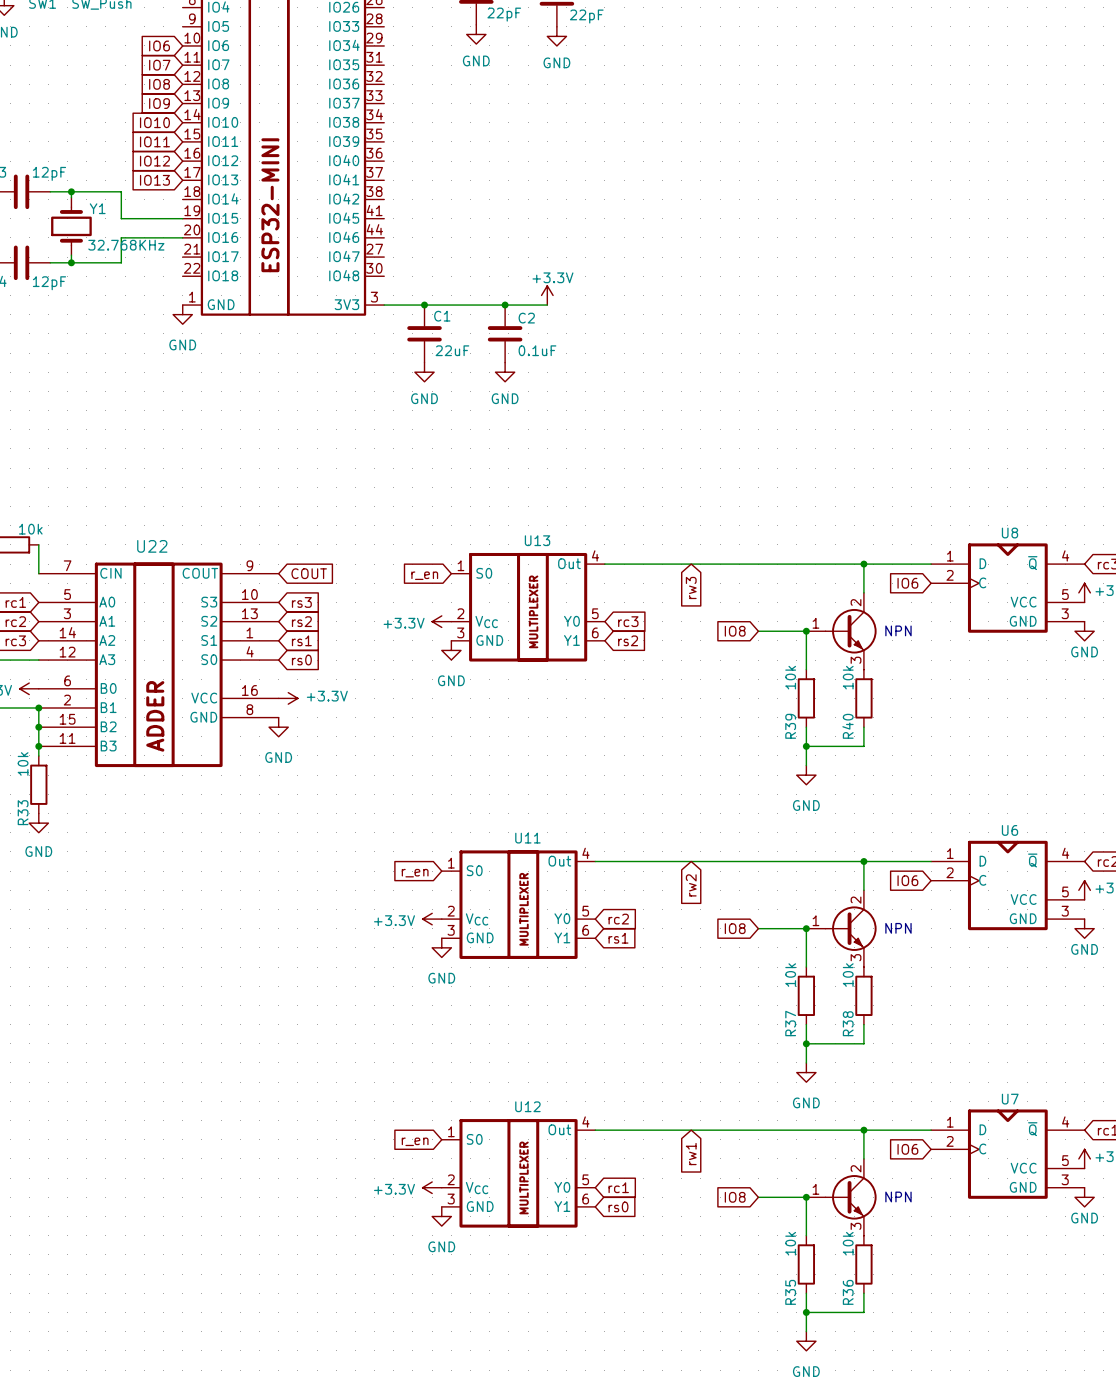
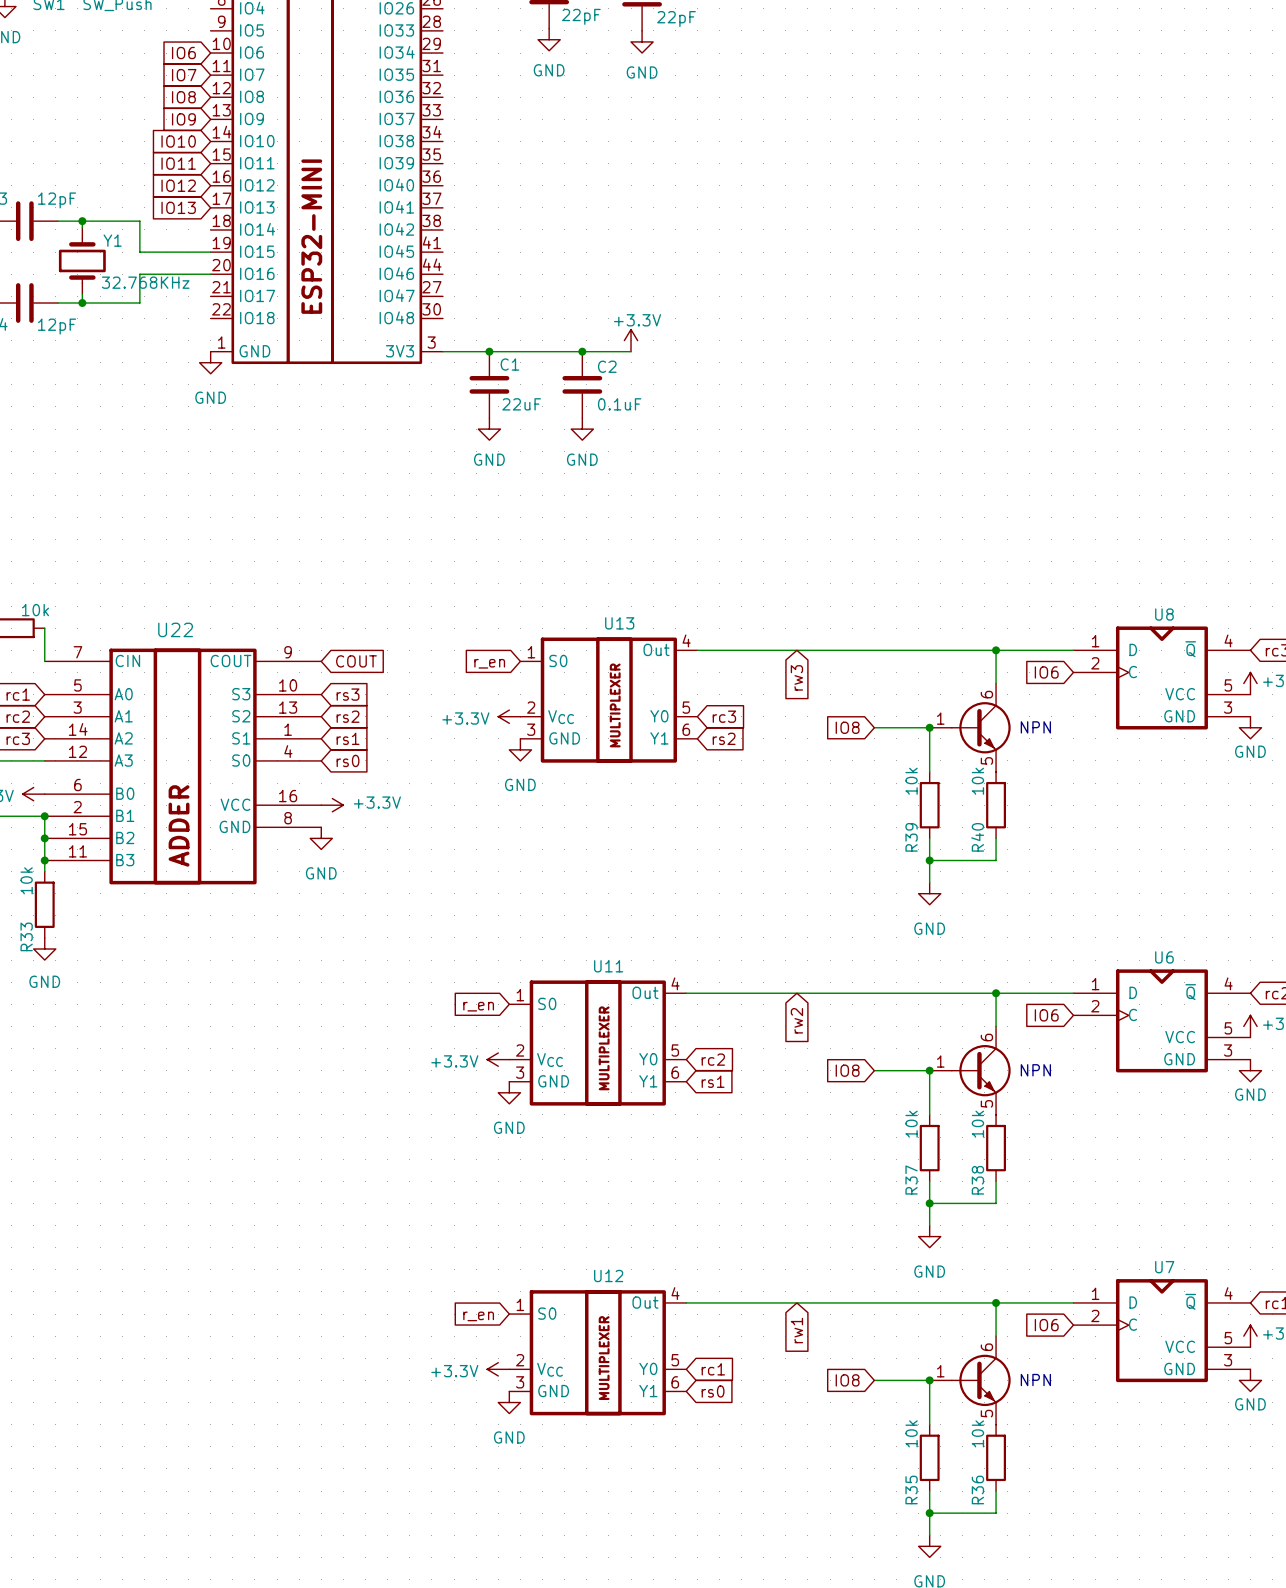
part pin number: 2 (856, 602) -> 6 (986, 694)
part pin number: 3 (856, 660) -> 5 (986, 760)
part pin number: 2 (856, 900) -> 6 (986, 1037)
part pin number: 3 (856, 957) -> 5 (986, 1103)
part pin number: 2 (856, 1168) -> 6 (986, 1347)
part pin number: 3 (856, 1226) -> 5 (986, 1413)

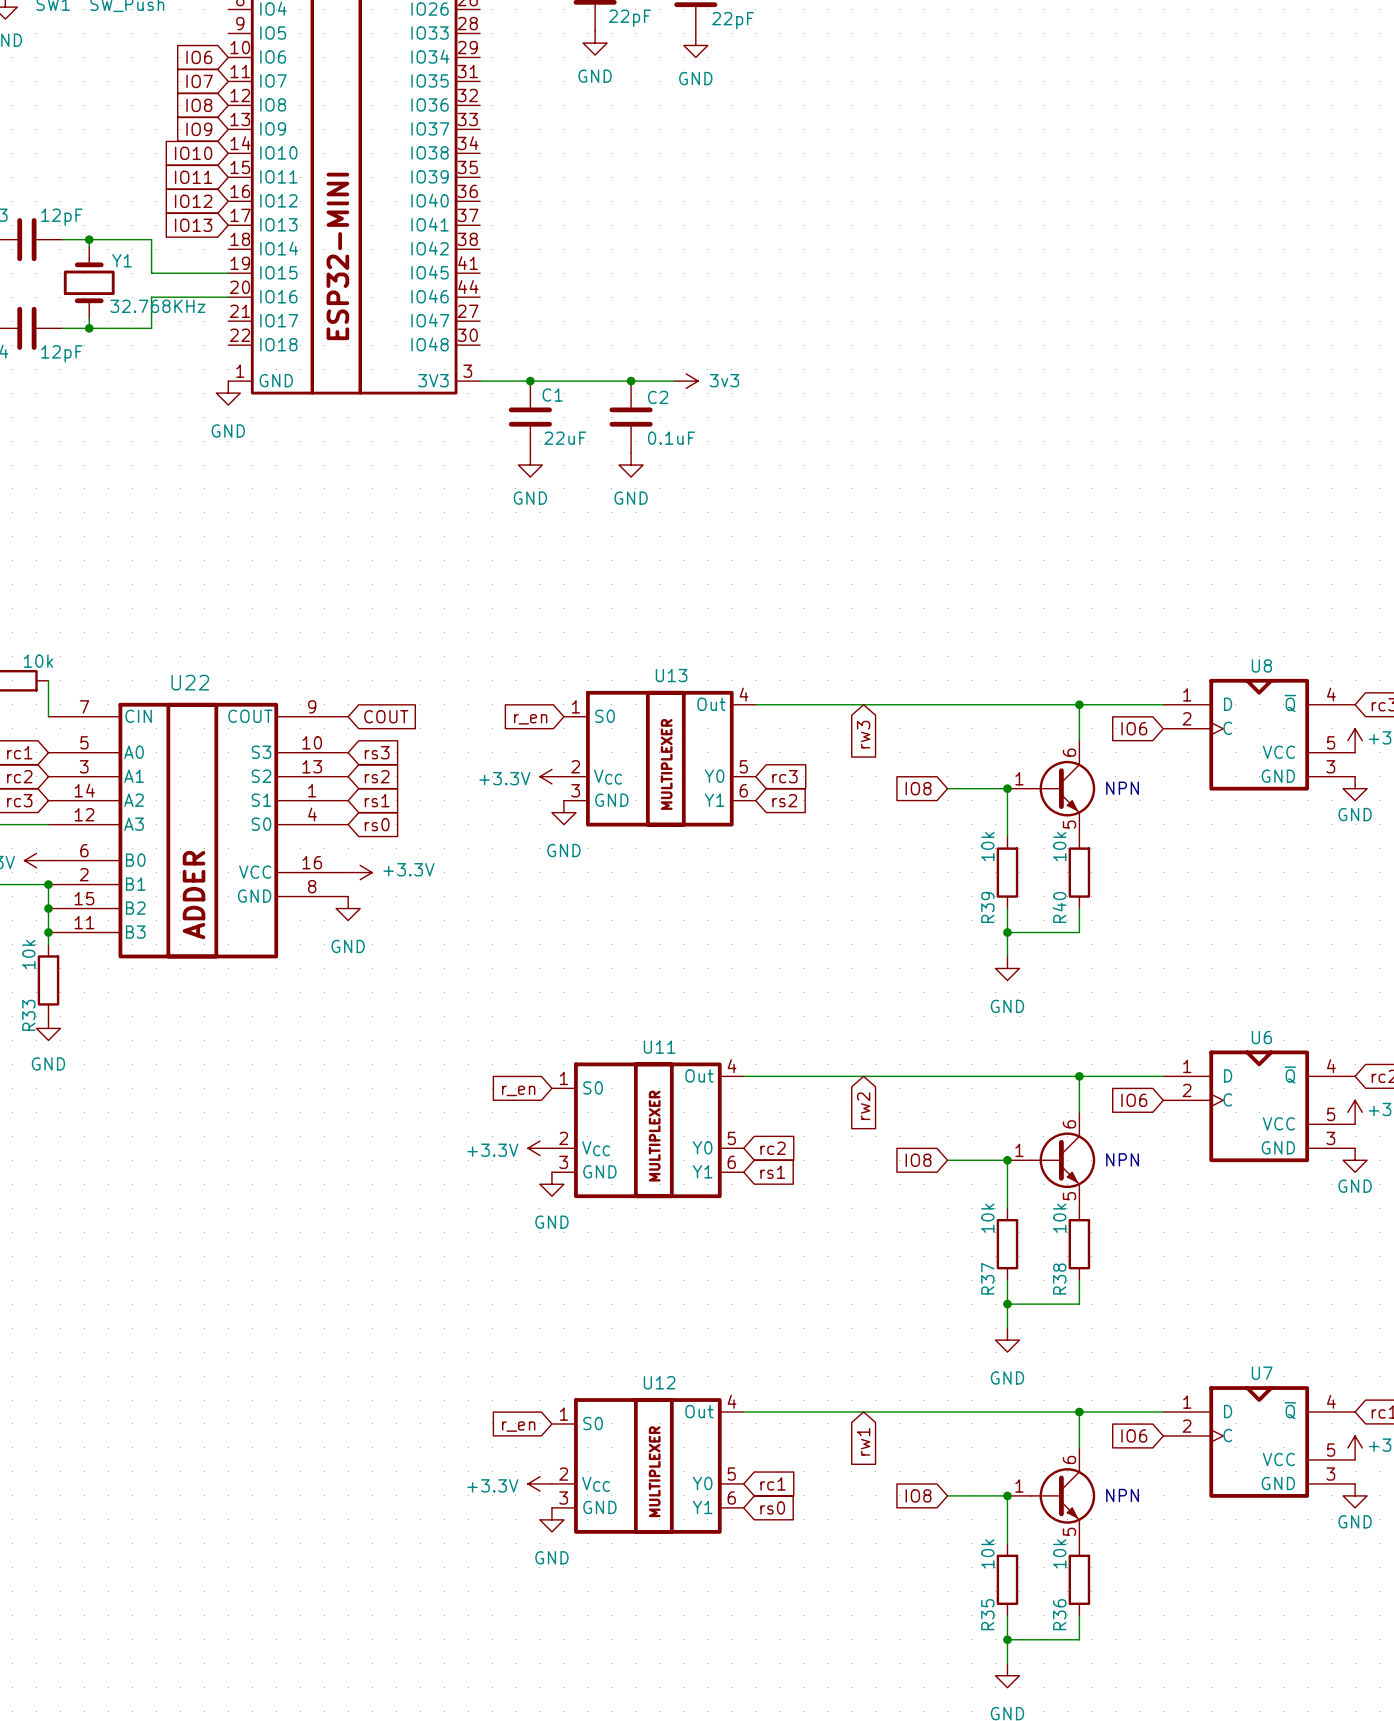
power symbol: +3.3V (631, 340) -> none
power symbol: none -> 3v3 (686, 381)

